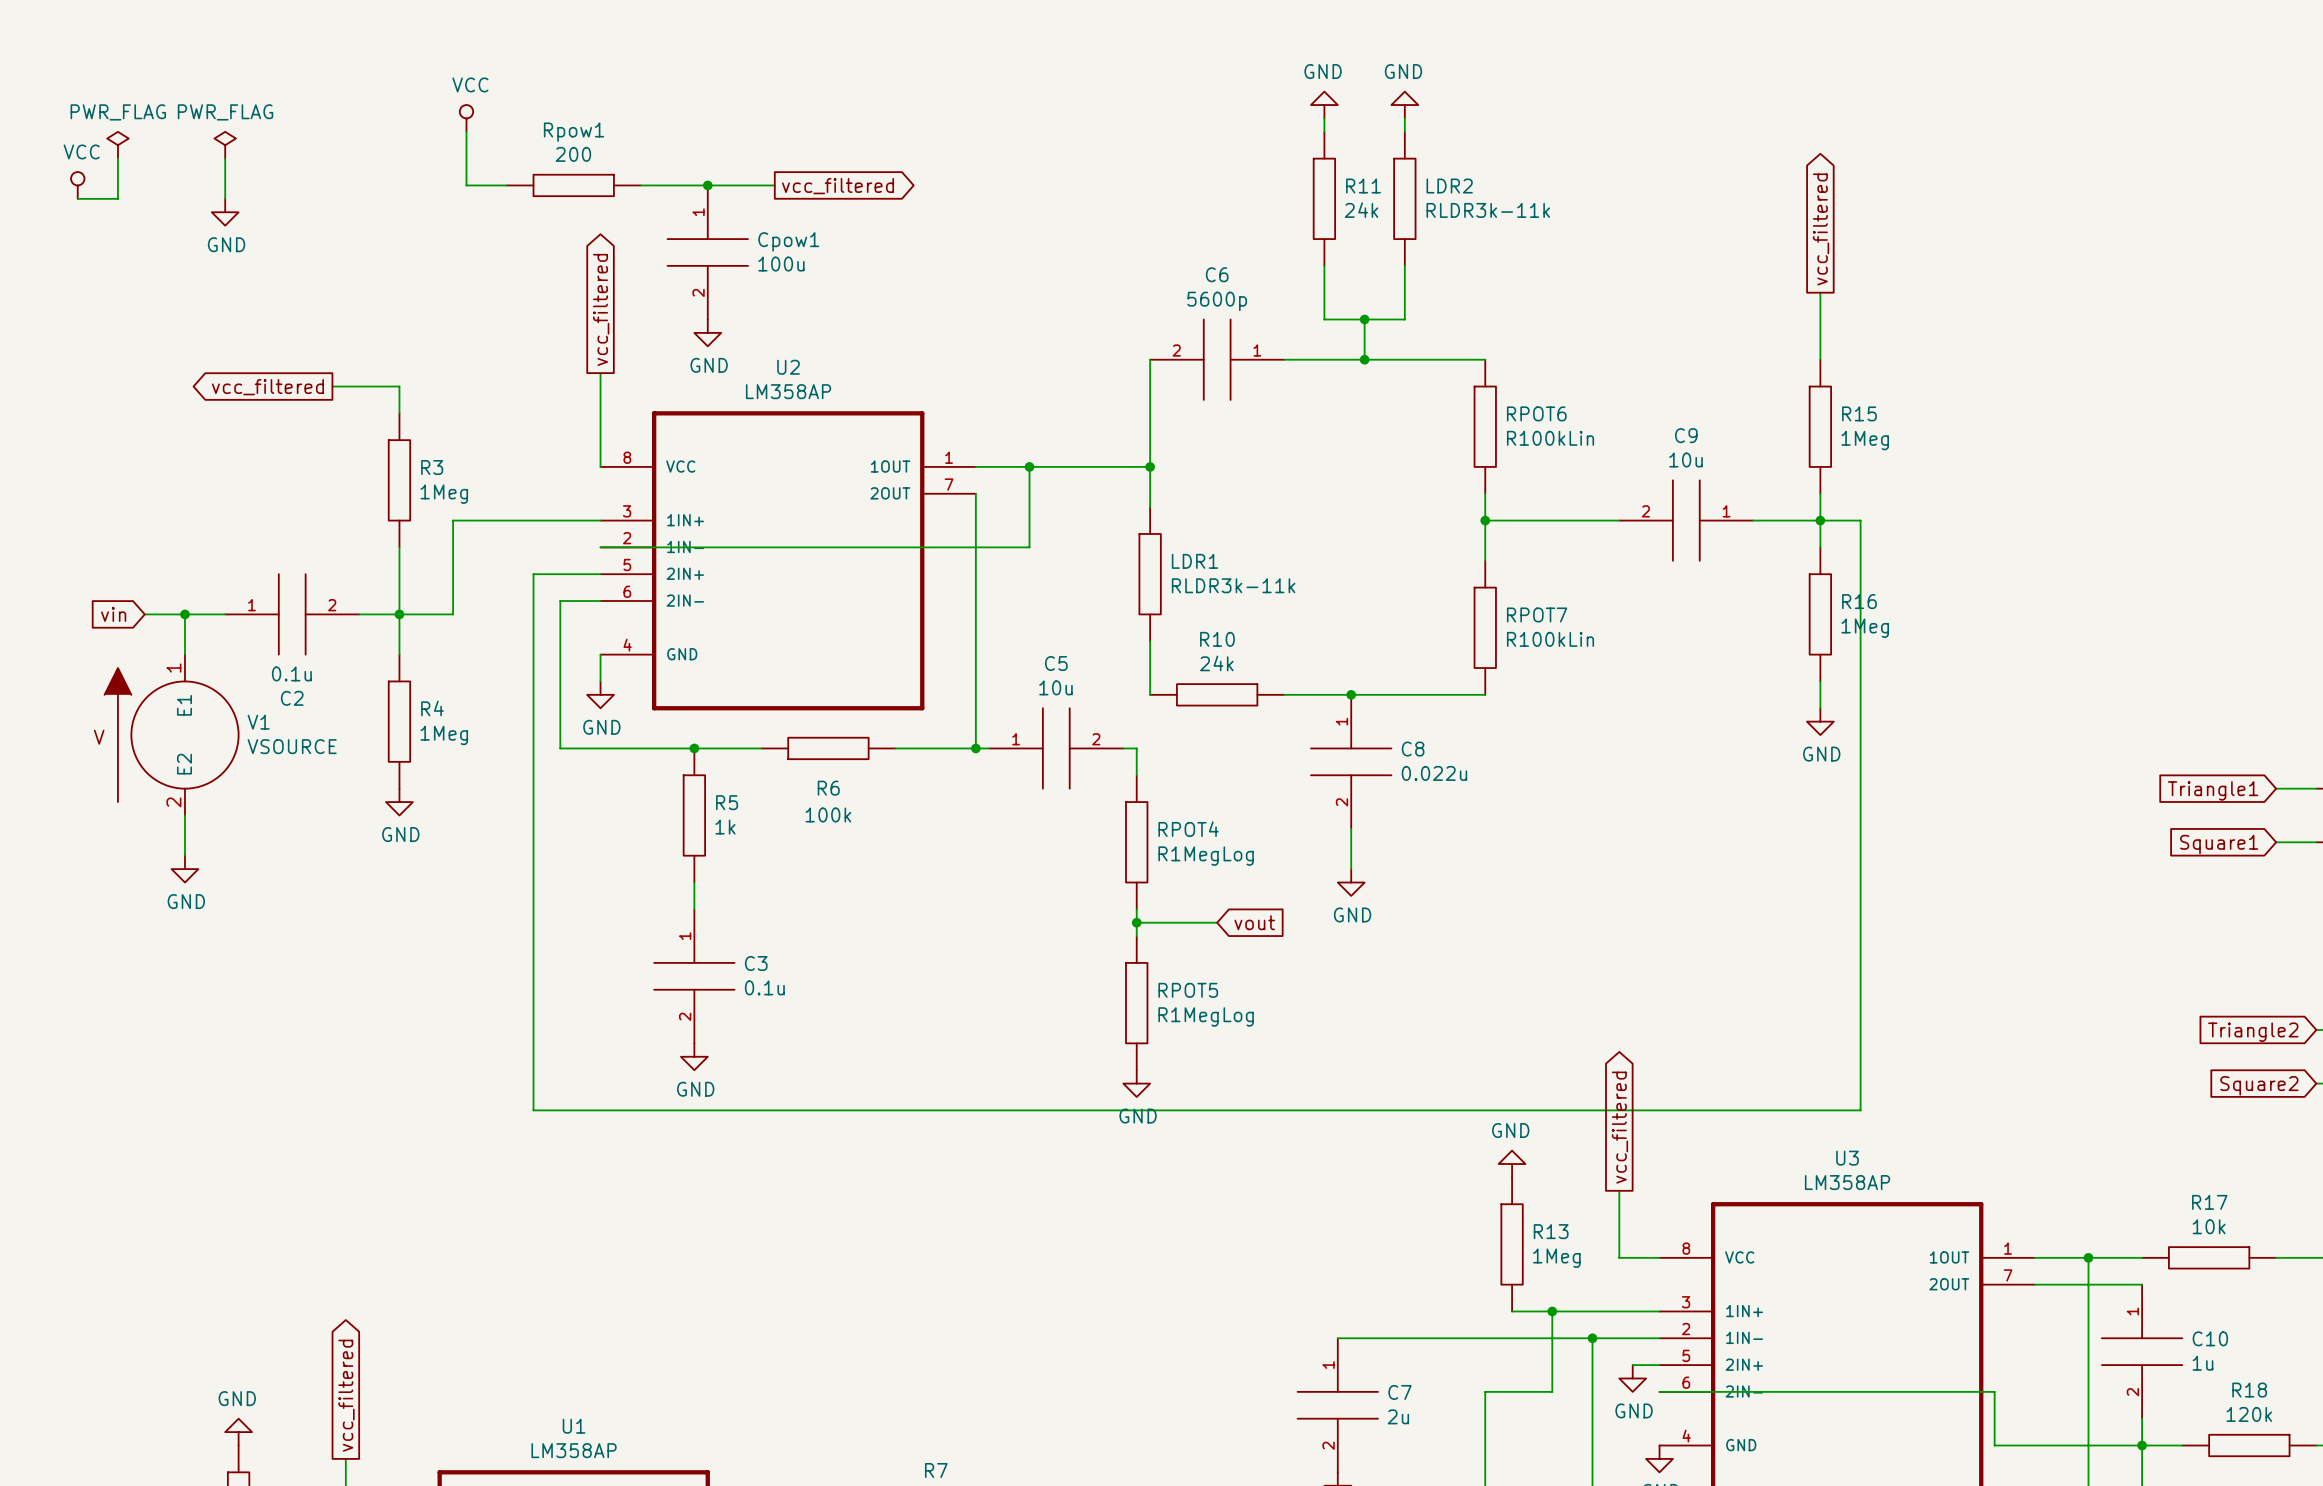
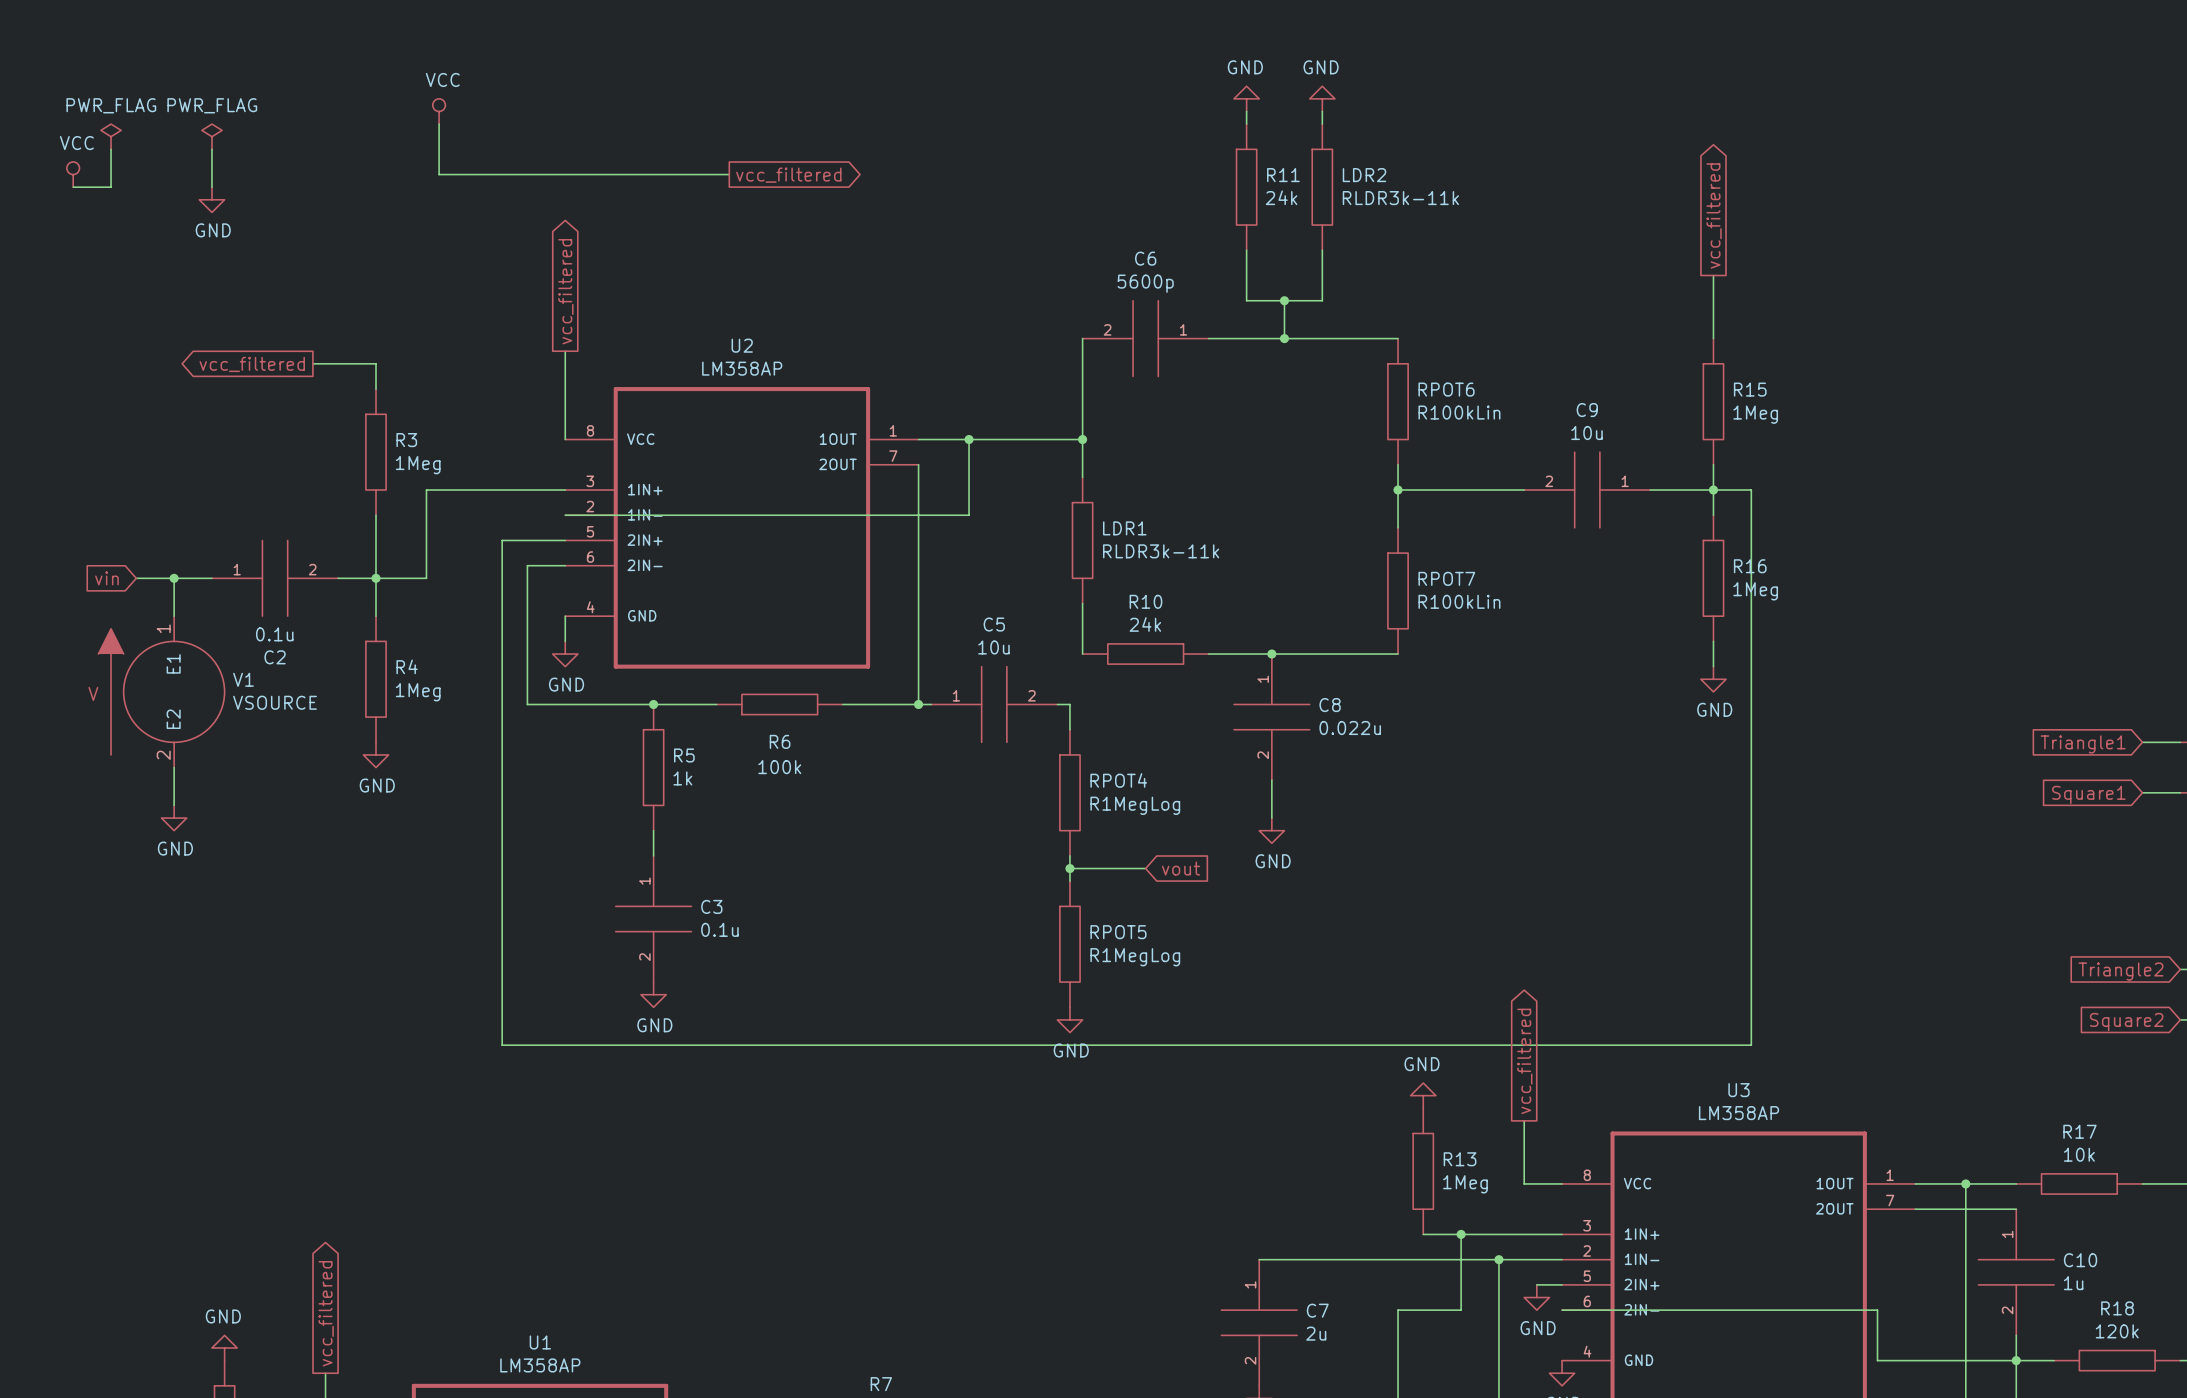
wire: none -> (476, 174) (603, 174)
Rpow1: 200 (573, 185) -> none
junction: (707, 185) -> none
Cpow1: 100u (707, 252) -> none
power symbol: GND (707, 332) -> none

